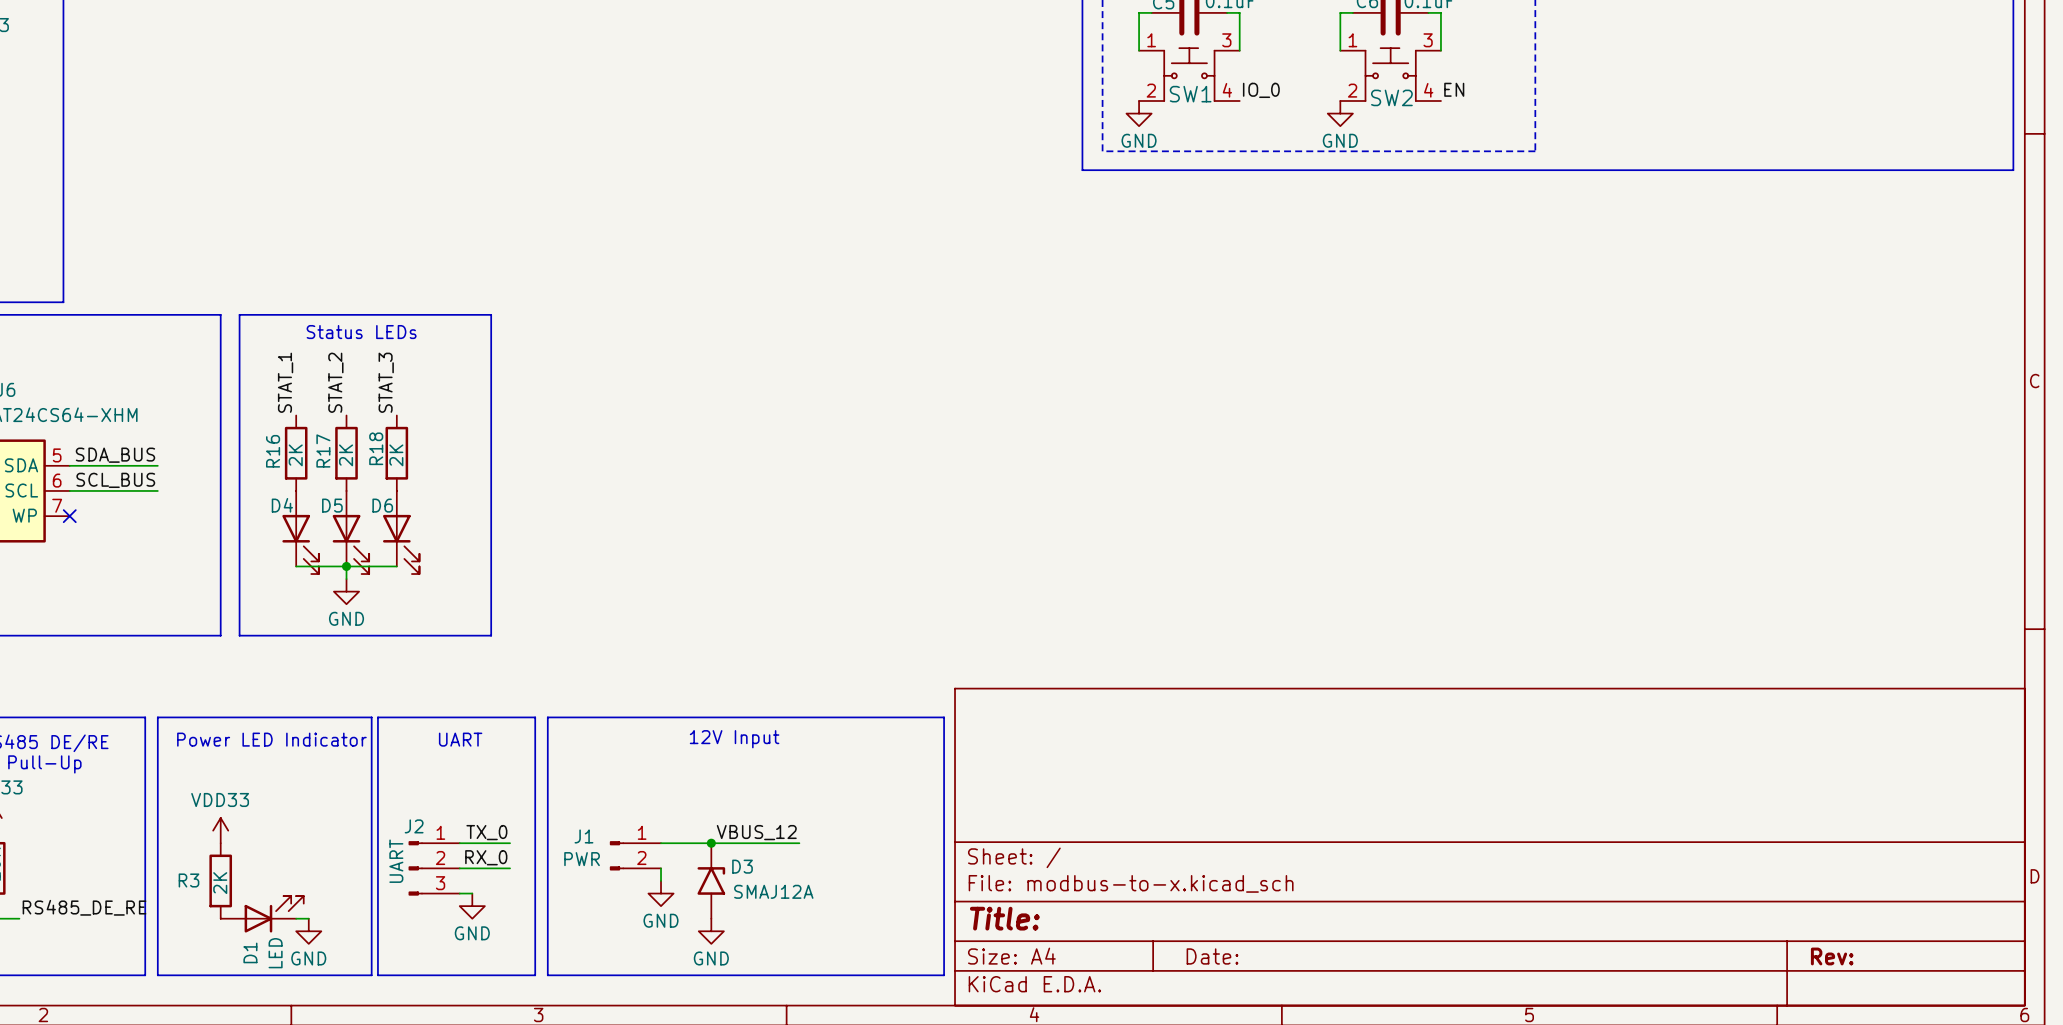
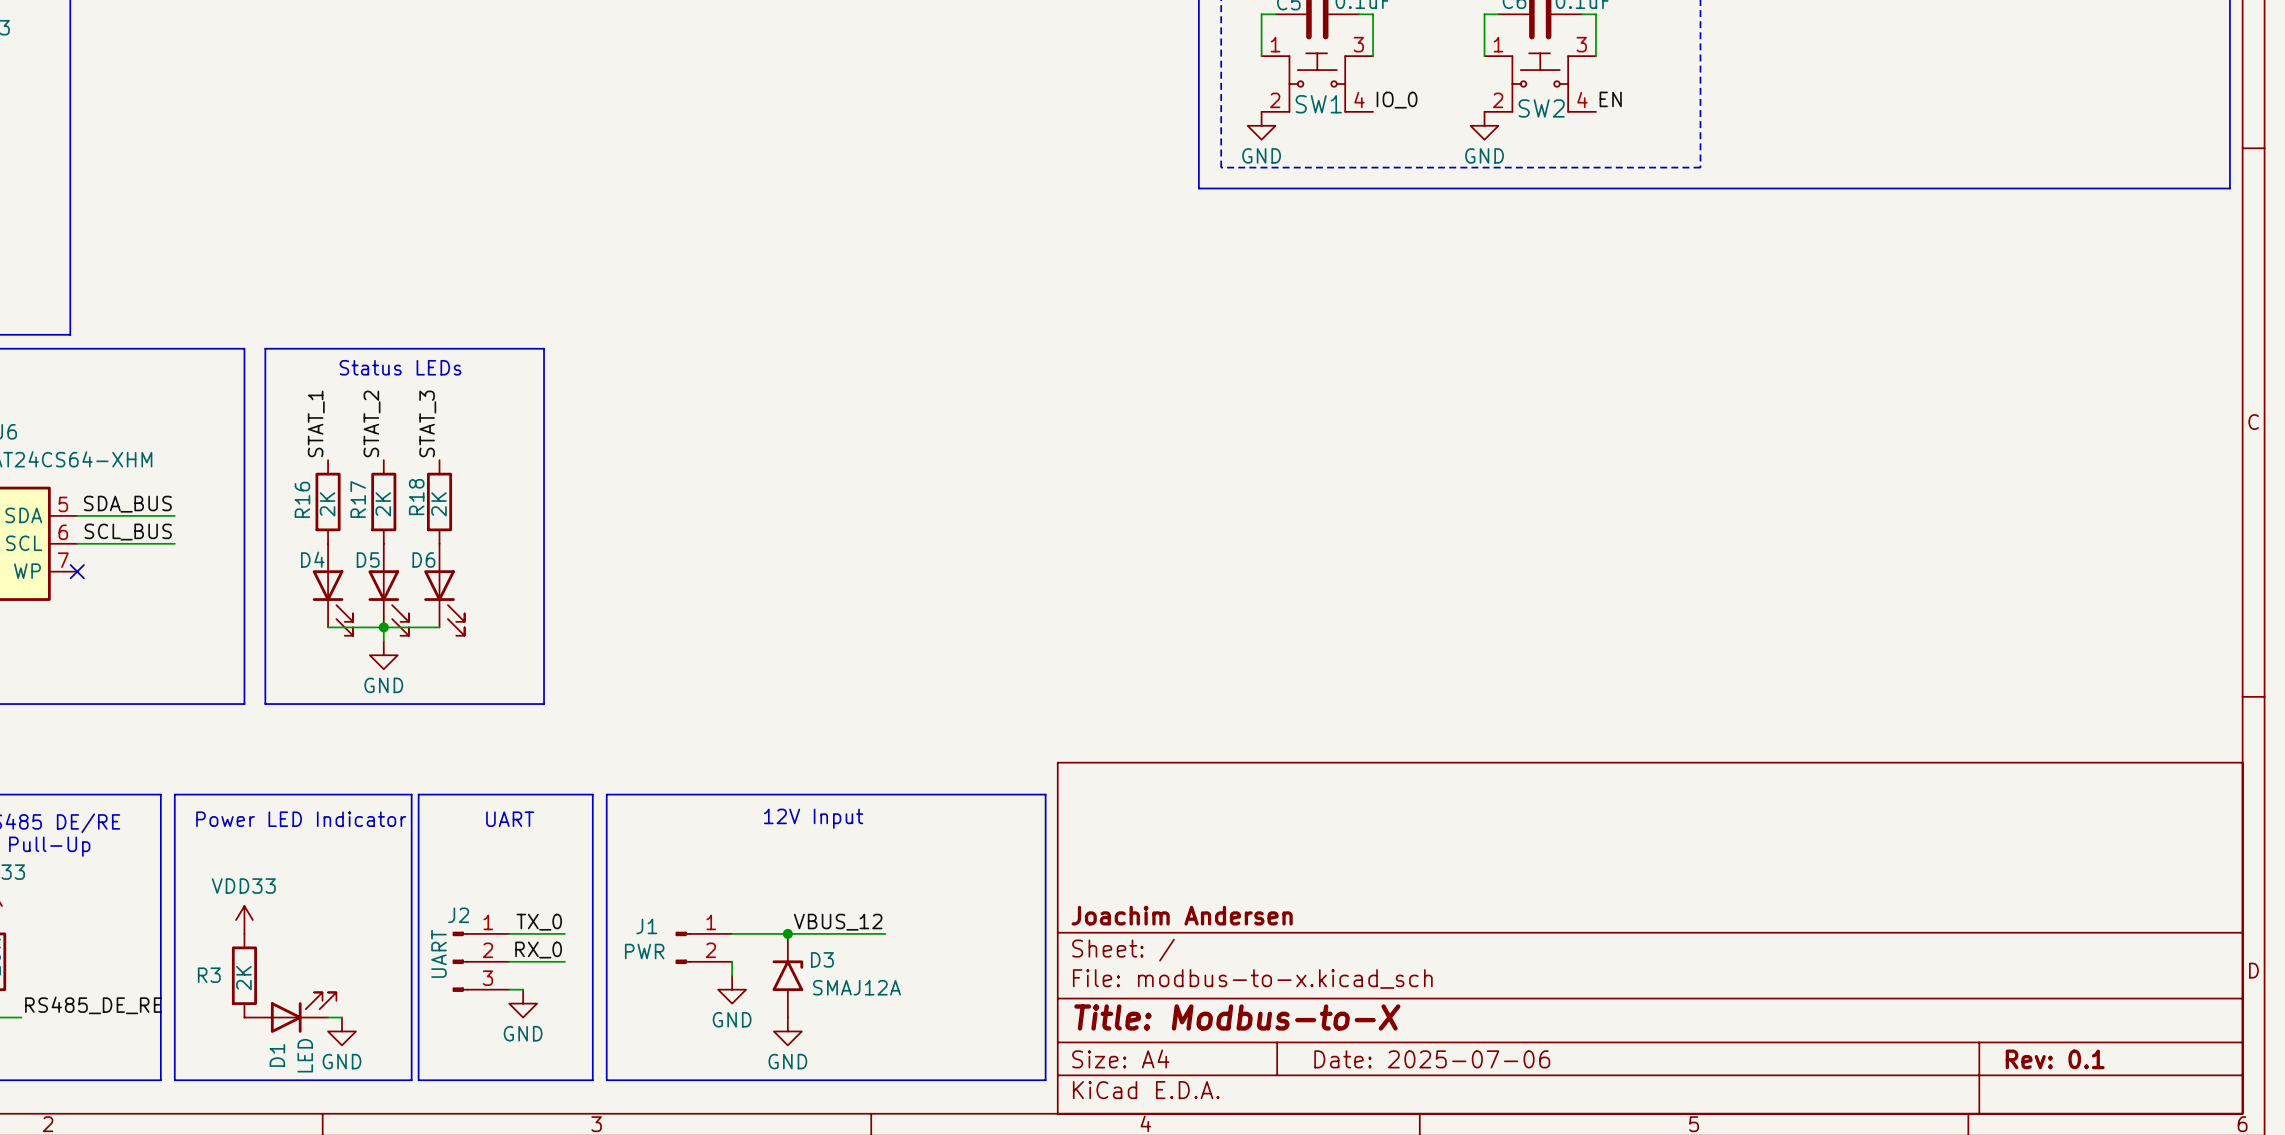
title block: none -> Joachim Andersen (1182, 915)
title block: Title: (1004, 918) -> Title: Modbus-to-X (1237, 1017)
title block: Date: (1212, 956) -> Date: 2025-07-06 (1432, 1059)
title block: Rev: (1832, 956) -> Rev: 0.1 (2055, 1059)

